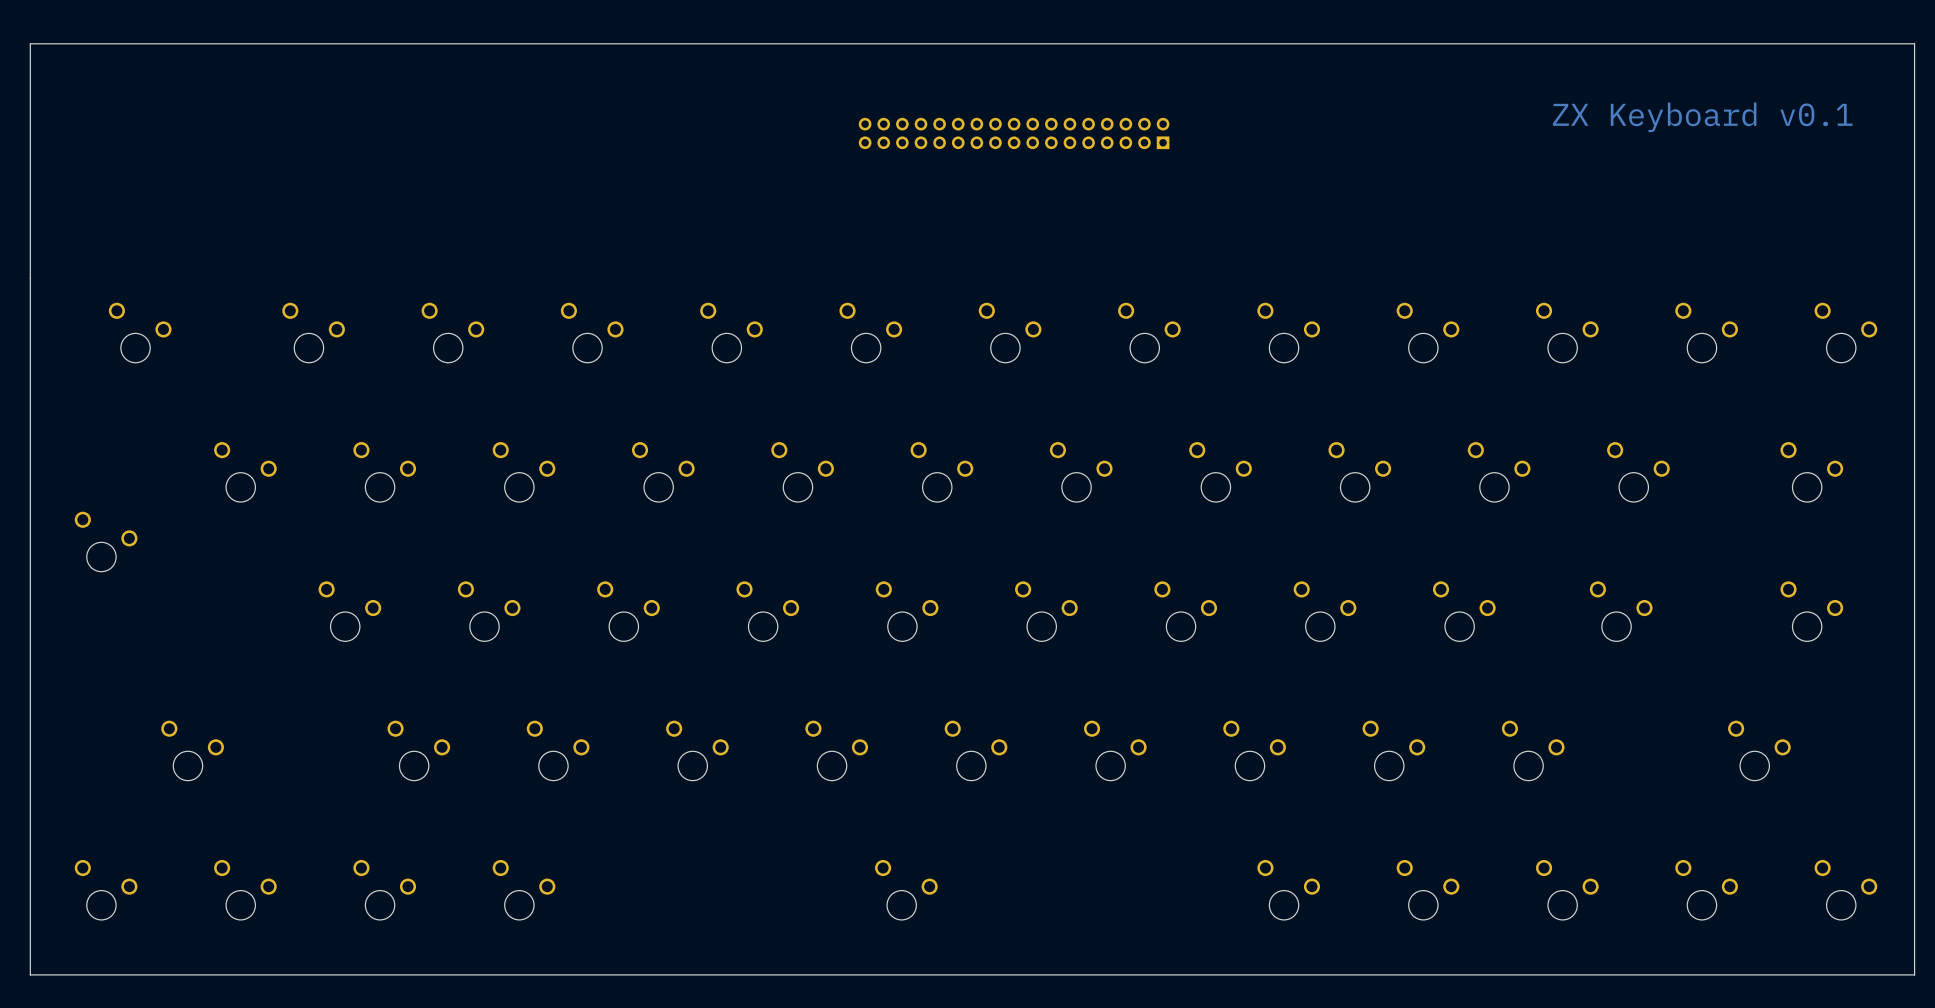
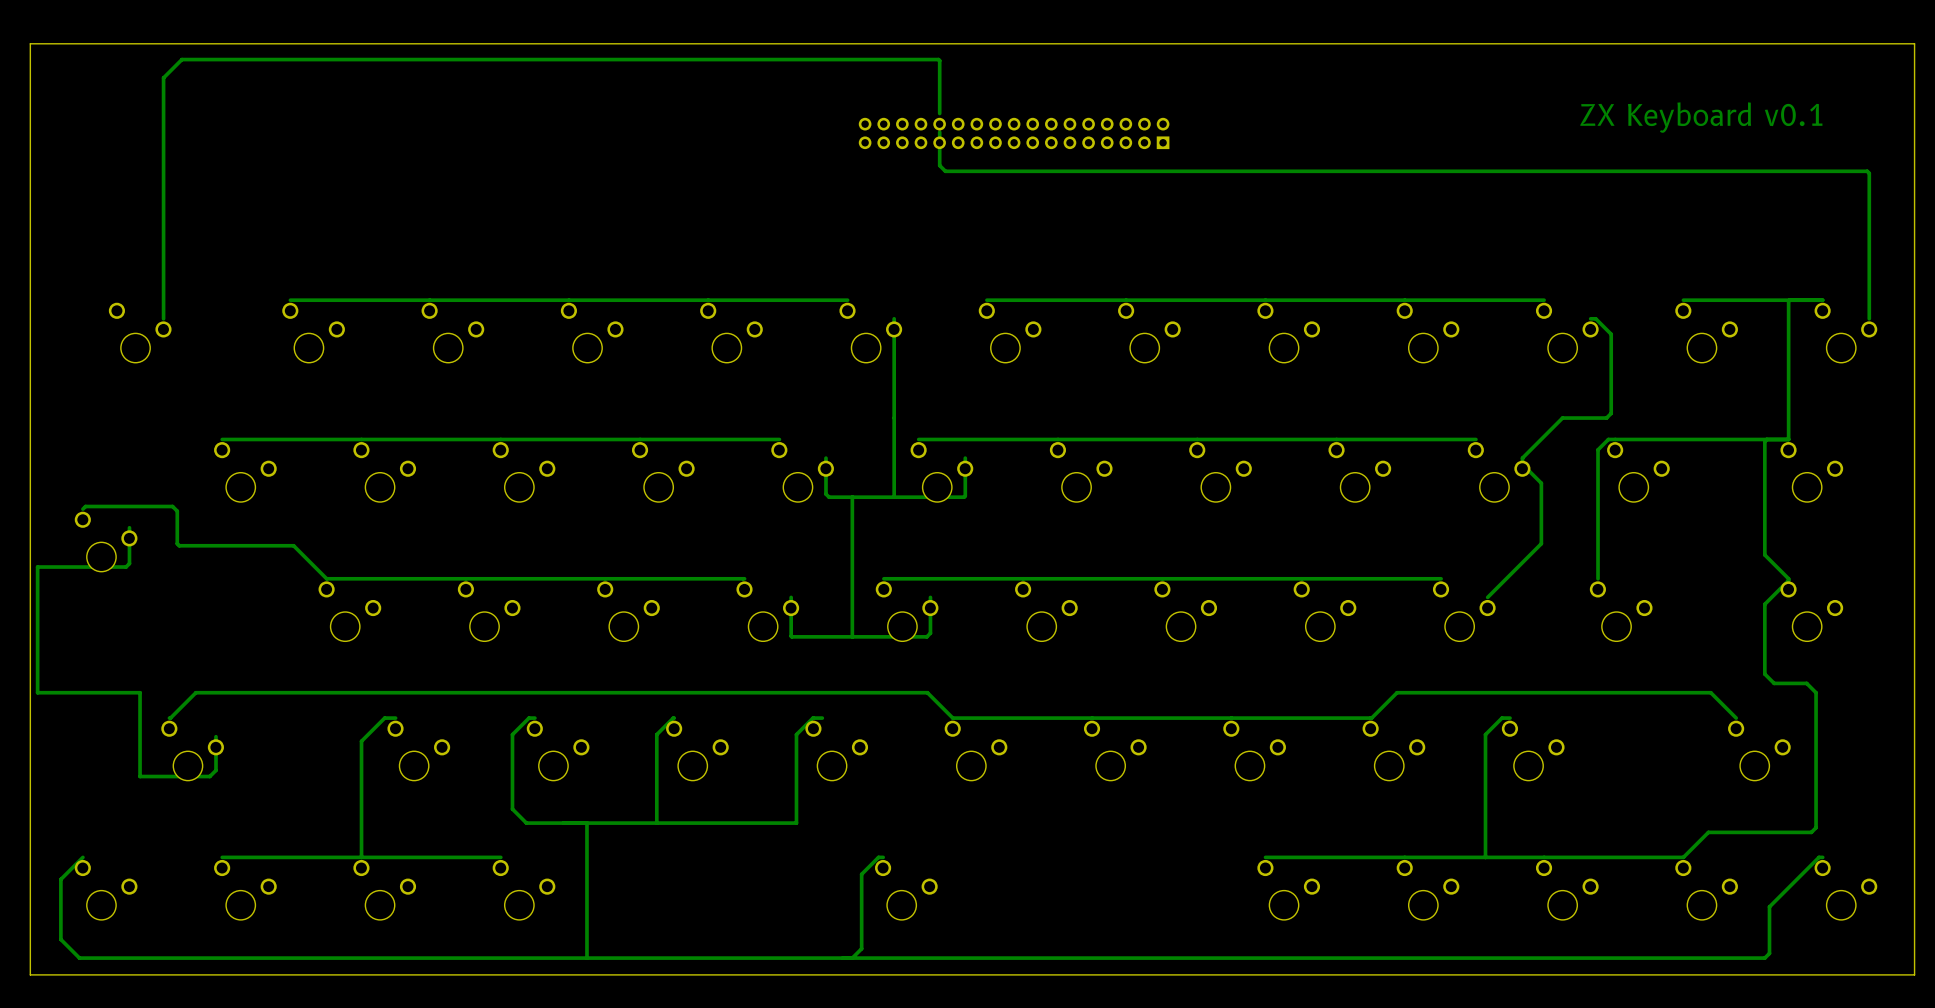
track: none -> (939, 113) (938, 59) (181, 59) (163, 77) (163, 318)
track: none -> (939, 132) (939, 165) (945, 171) (1867, 171) (1869, 173) (1869, 318)
track: none -> (847, 300) (290, 300)
track: none -> (1544, 300) (986, 300)
track: none -> (1789, 300) (1788, 439) (1608, 439) (1598, 449) (1598, 578)
track: none -> (1822, 300) (1683, 300)
track: none -> (894, 318) (894, 497)
track: none -> (1590, 318) (1595, 318) (1611, 334) (1611, 413) (1606, 418) (1562, 418) (1522, 458) (1522, 464) (1541, 483) (1541, 543) (1487, 597)
track: none -> (779, 439) (222, 439)
track: none -> (1475, 439) (918, 439)
track: none -> (1766, 439) (1764, 441) (1764, 555) (1788, 580) (1764, 604) (1764, 674) (1774, 683) (1806, 683) (1816, 692) (1816, 827) (1811, 832) (1708, 832) (1683, 857) (1265, 857)
track: none -> (965, 458) (964, 497) (829, 497) (825, 494) (825, 458)
track: none -> (852, 497) (852, 636)
track: none -> (82, 509) (85, 506) (172, 506) (177, 511) (177, 543) (179, 545) (293, 545) (326, 578) (744, 578)
track: none -> (129, 527) (129, 563) (126, 567) (37, 567) (37, 692) (140, 692) (140, 776) (209, 776) (215, 770) (215, 736)
track: none -> (1441, 578) (883, 578)
track: none -> (930, 597) (930, 633) (926, 636) (791, 636) (791, 597)
track: none -> (395, 718) (384, 718) (361, 741) (361, 857)
track: none -> (674, 718) (656, 734) (656, 823)
track: none -> (822, 718) (813, 718) (796, 734) (796, 823) (526, 823) (512, 809) (512, 734) (529, 718) (534, 718)
track: none -> (1510, 718) (1502, 718) (1485, 734) (1485, 857)
track: none -> (1736, 718) (1710, 692) (1397, 692) (1371, 718) (952, 718) (927, 692) (195, 692) (169, 718)
track: none -> (586, 823) (586, 958)
track: none -> (500, 857) (222, 857)
track: none -> (883, 857) (878, 857) (861, 874) (861, 948) (852, 958)
track: none -> (1822, 857) (1818, 857) (1769, 906) (1769, 953) (1764, 958) (79, 958) (60, 939) (60, 879) (82, 857)

